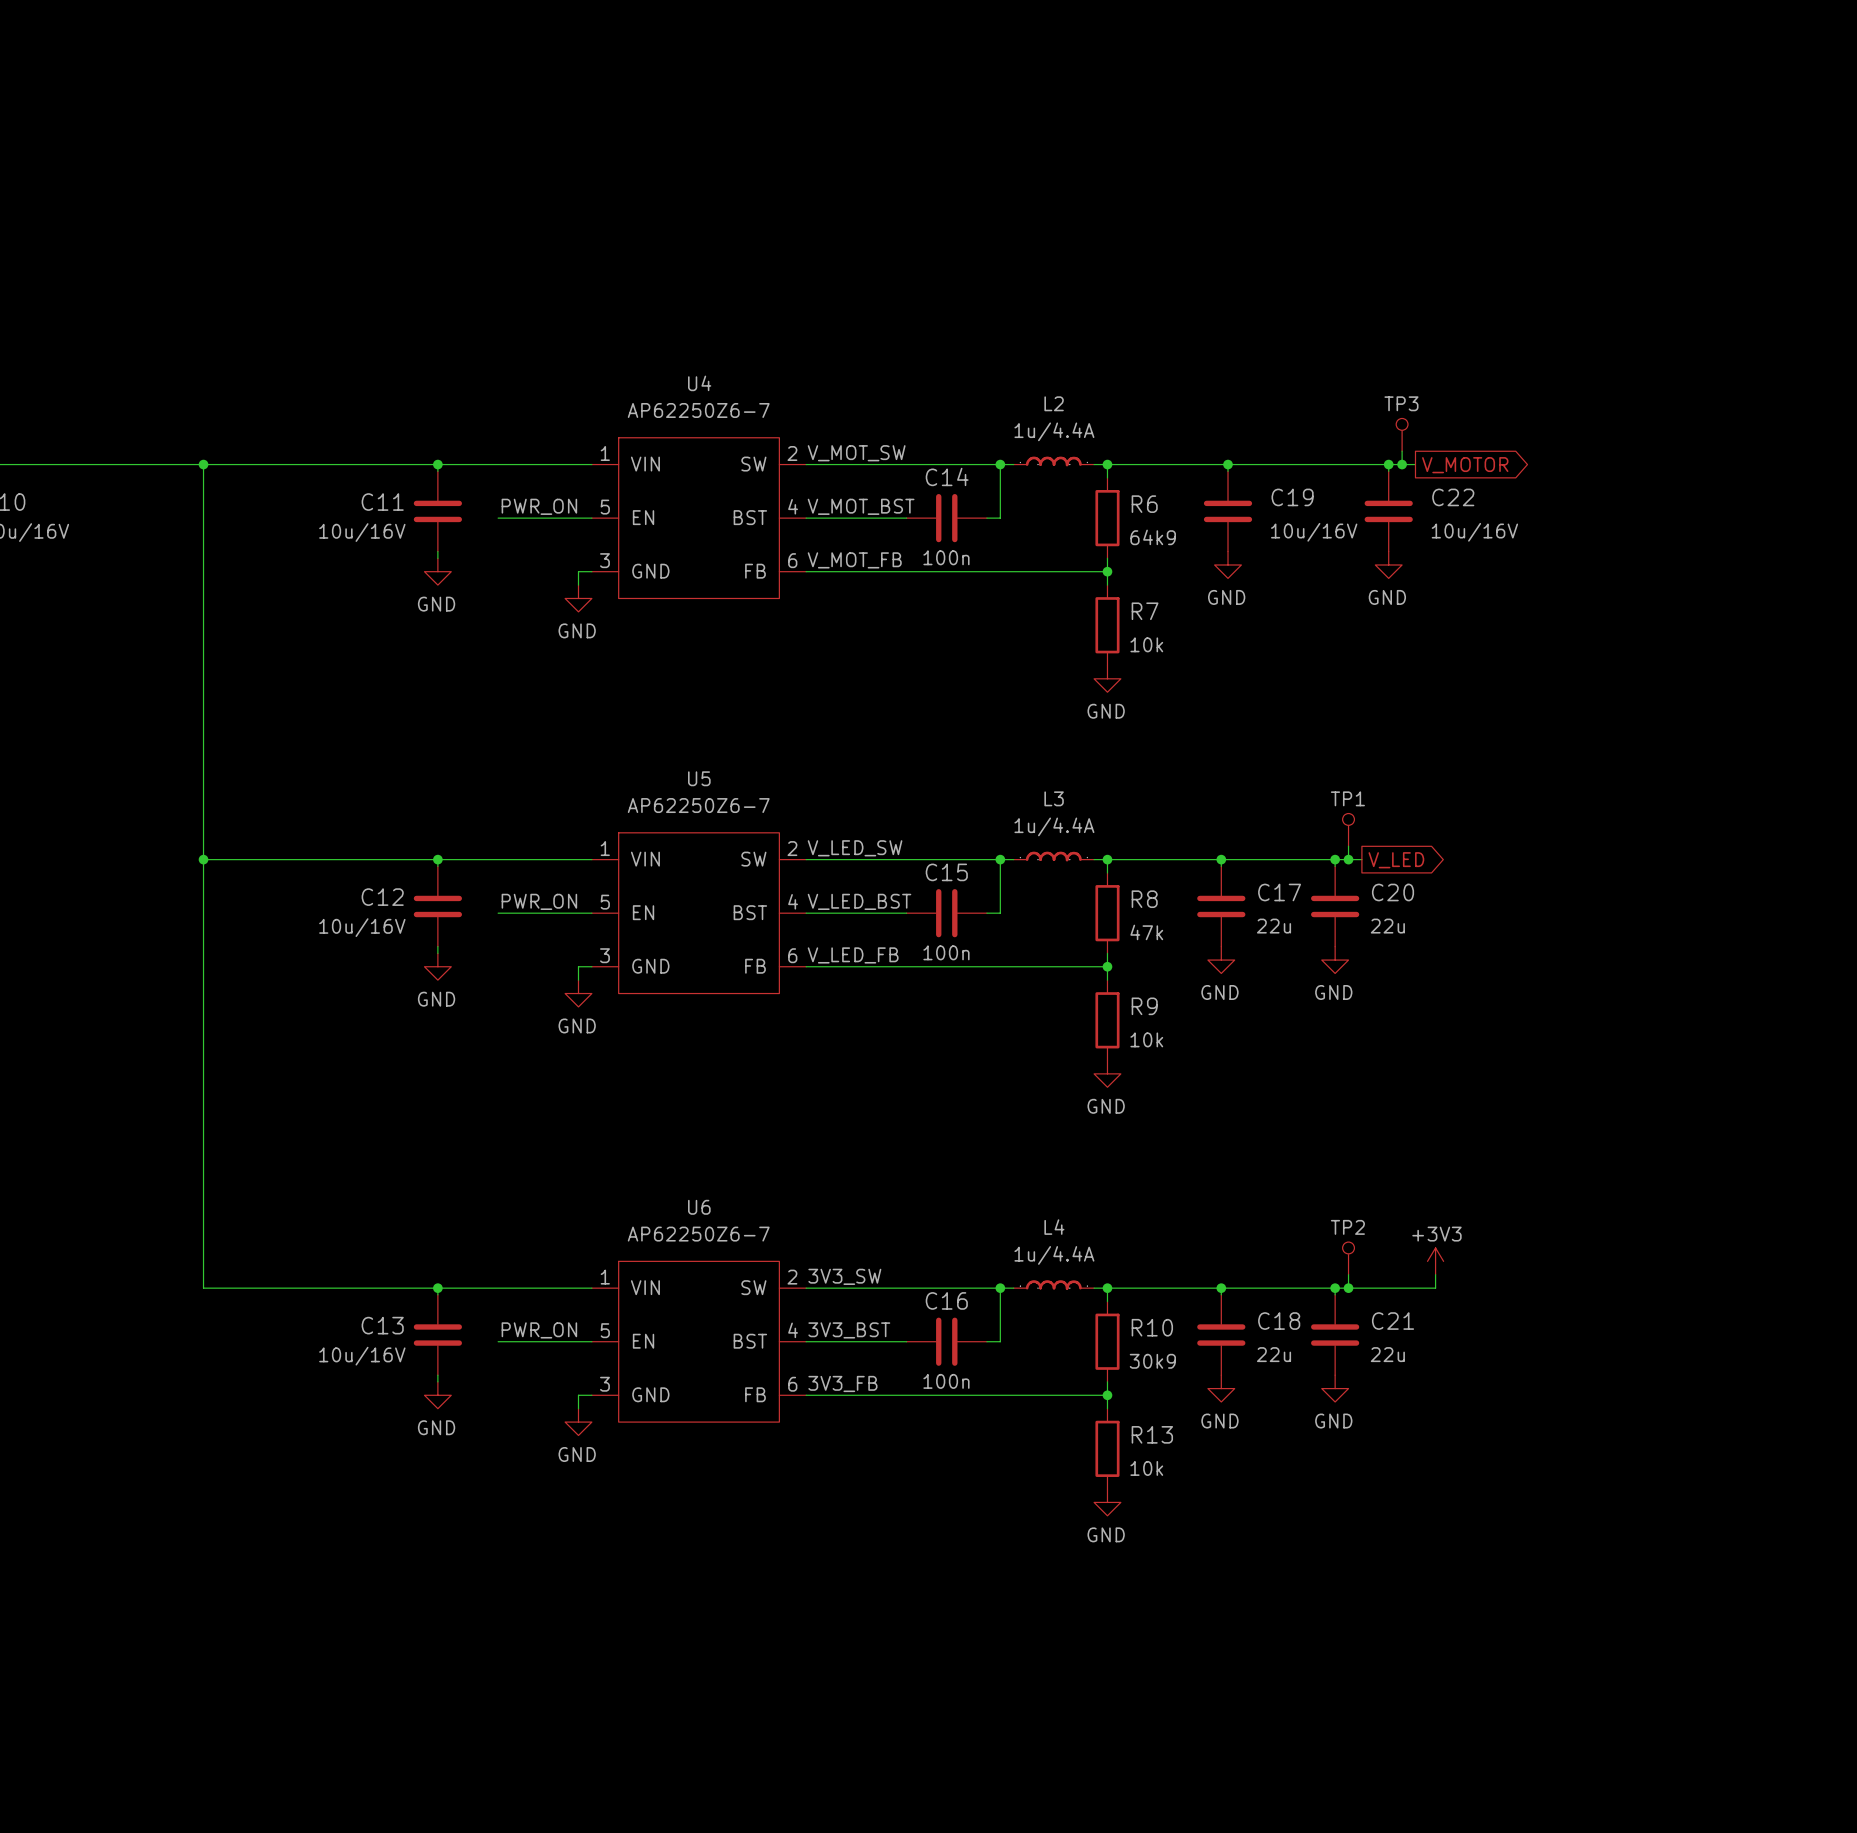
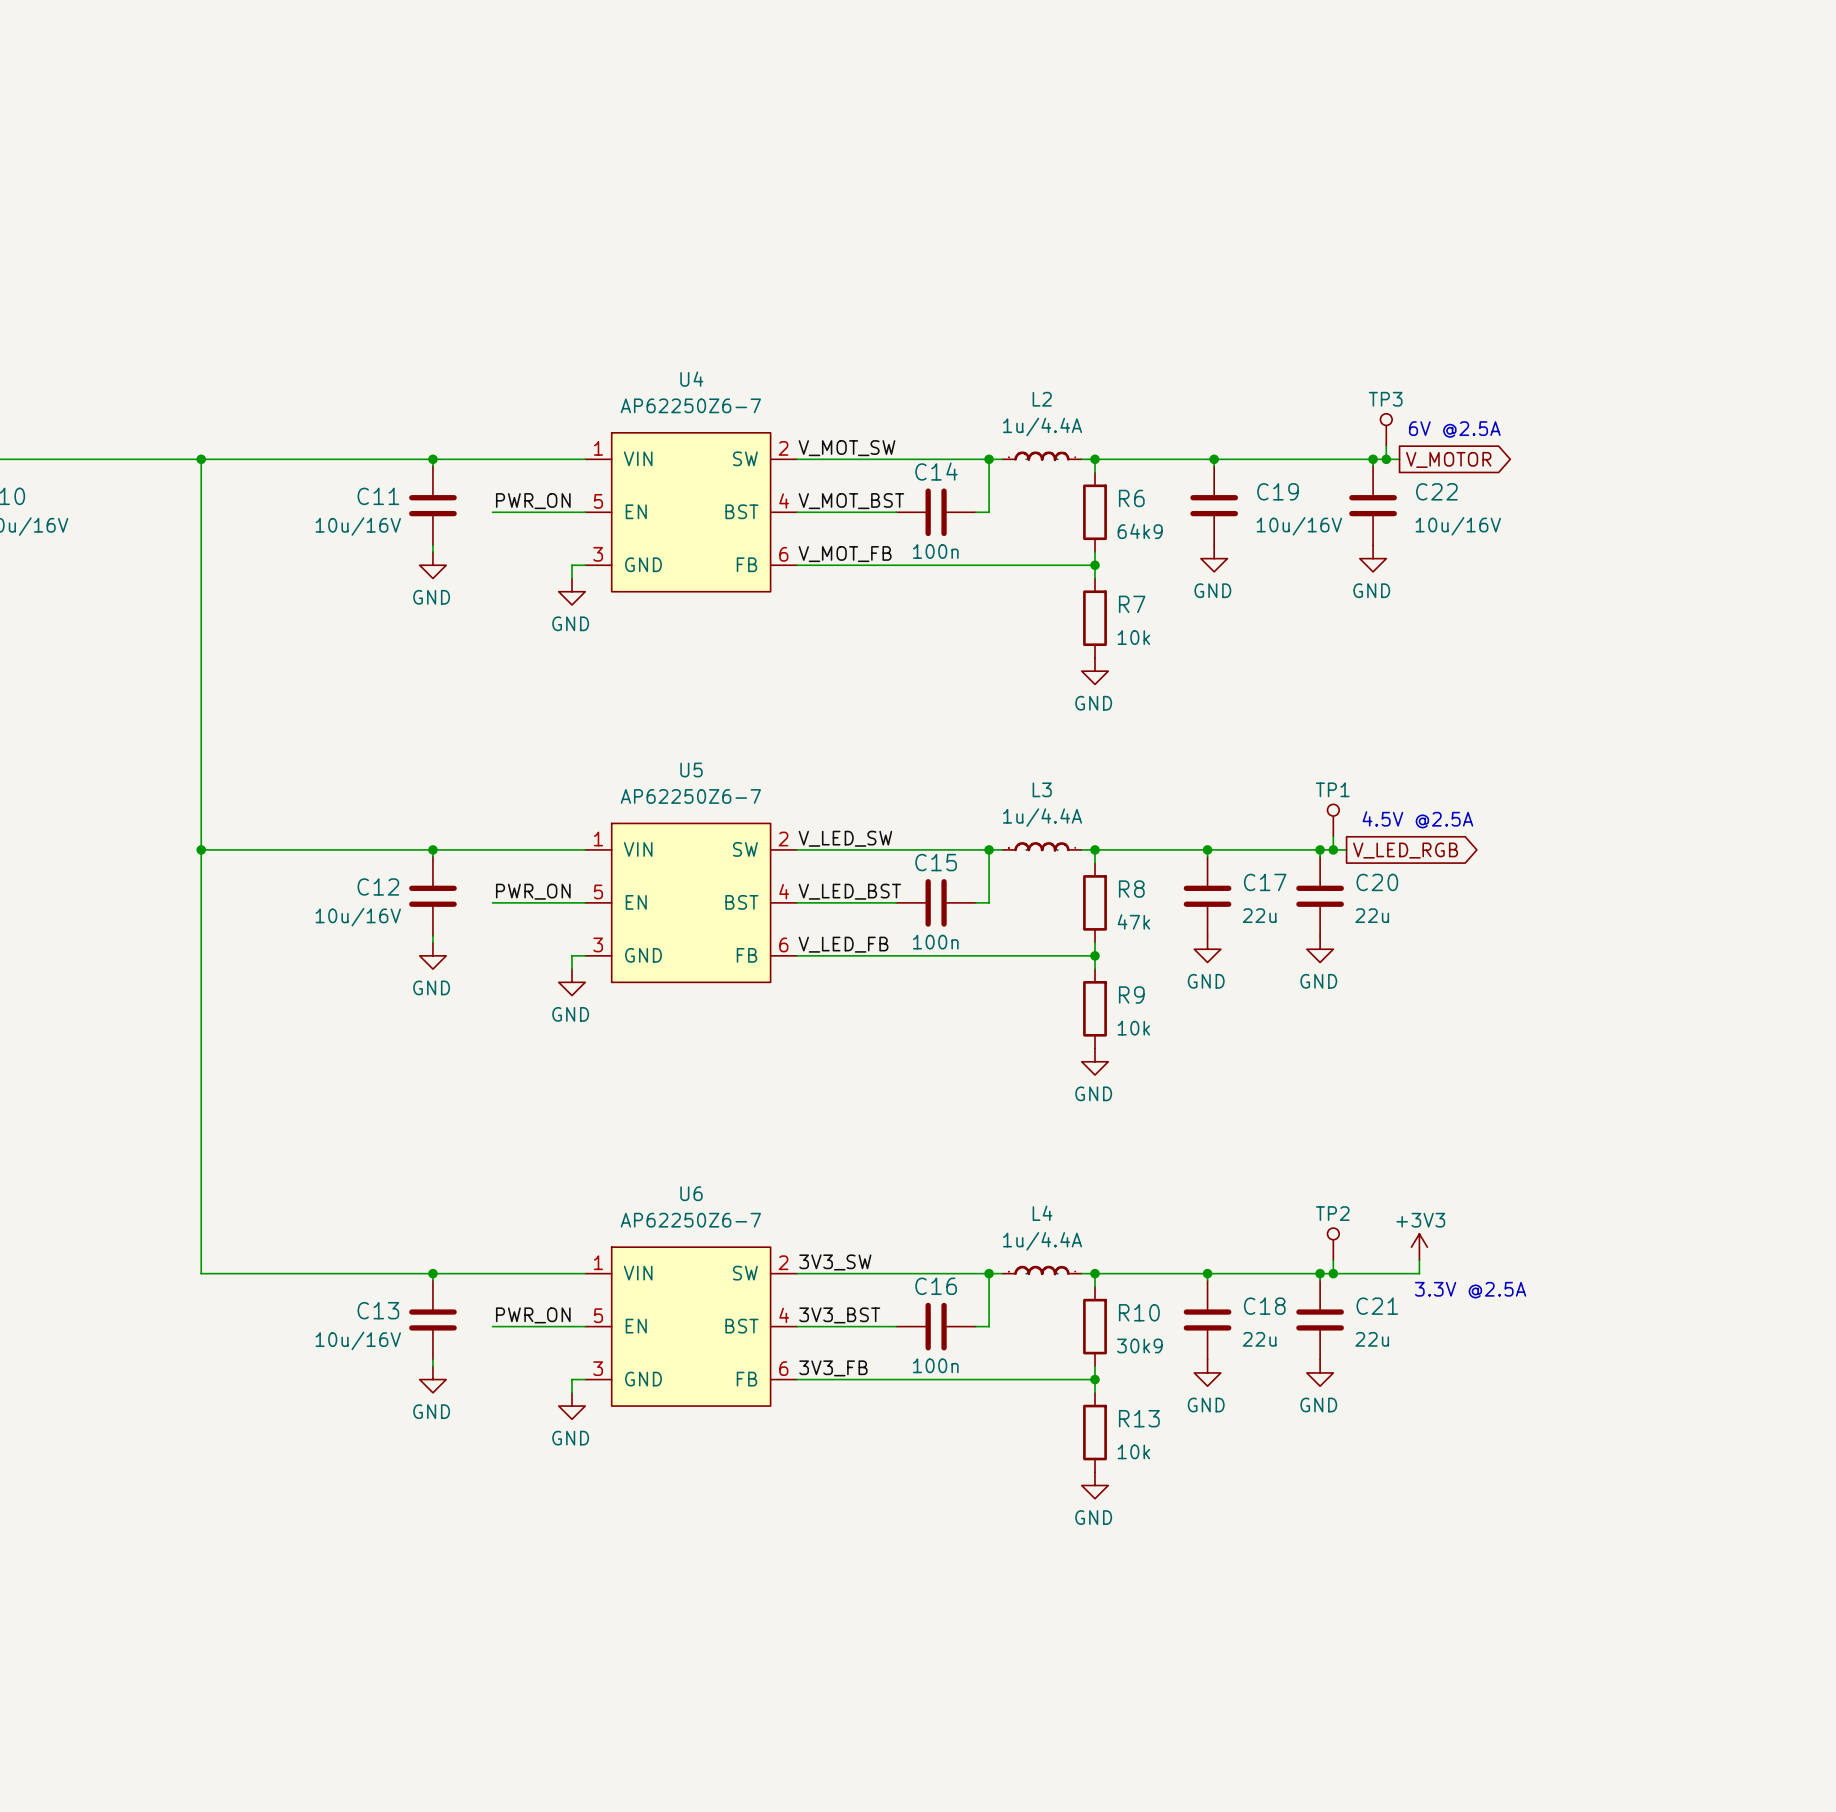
text: none -> 6V @2.5A (1454, 429)
text: none -> 4.5V @2.5A (1417, 819)
global label: V_LED (1396, 860) -> V_LED_RGB (1405, 850)
text: none -> 3.3V @2.5A (1470, 1290)

